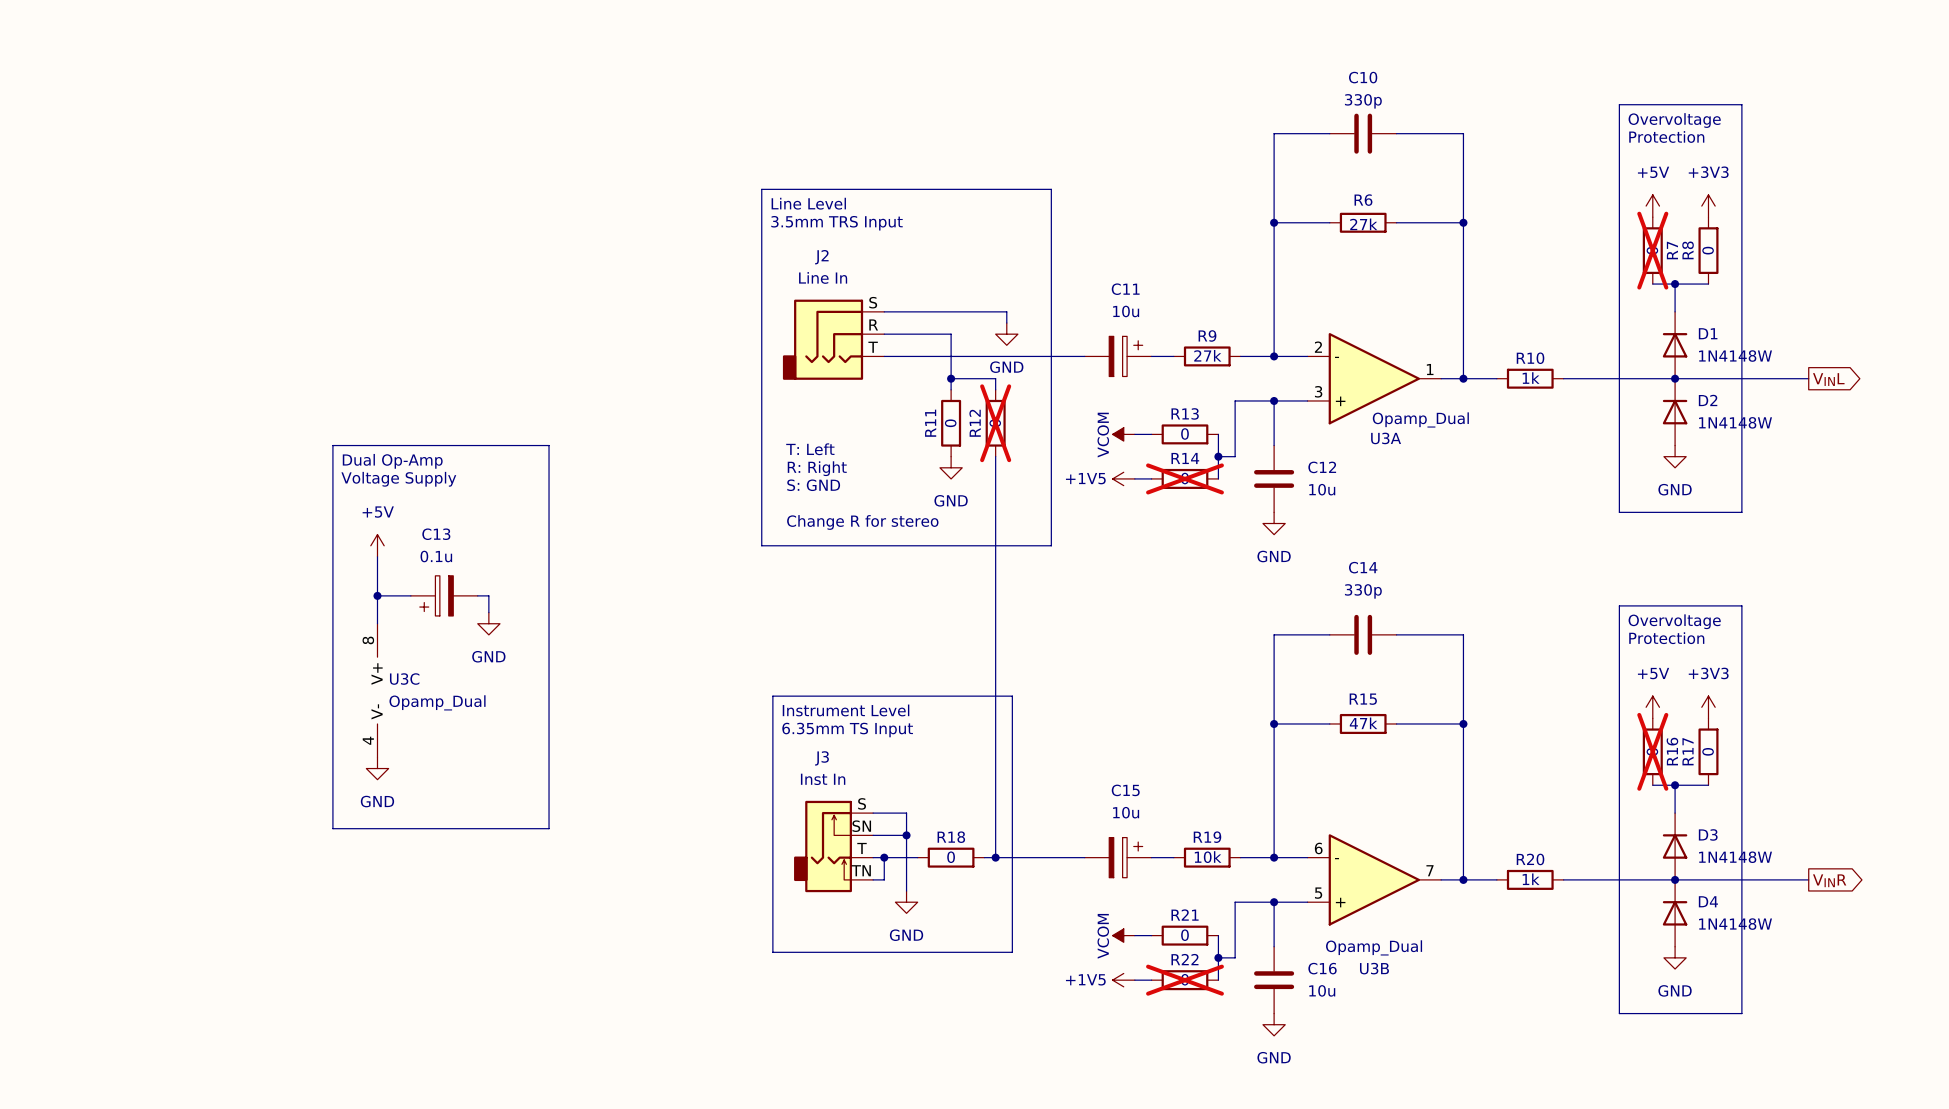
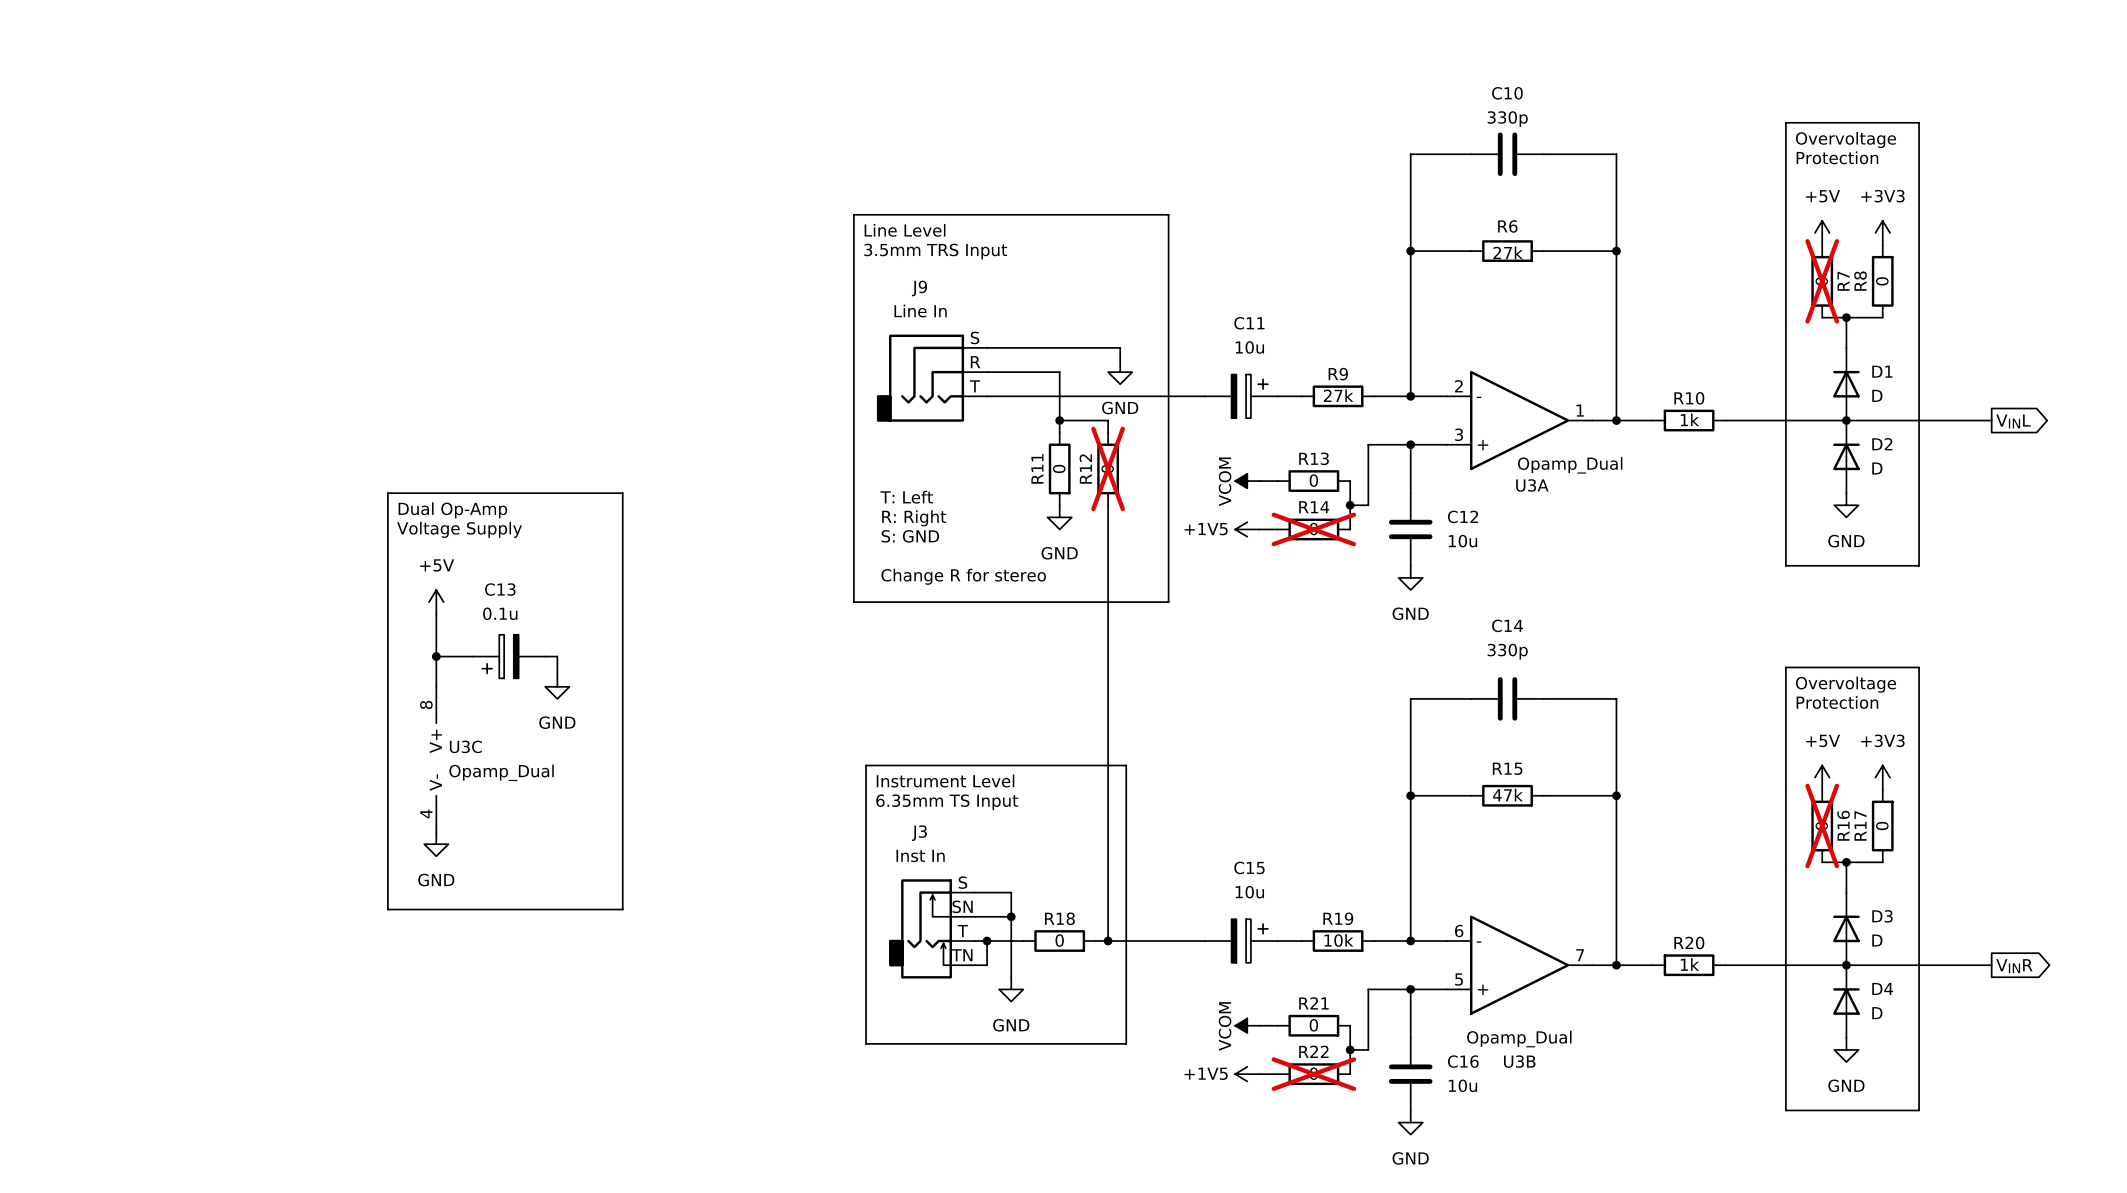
J2 name: J2 (821, 257) -> J9 (919, 288)
D1 value: 1N4148W (1735, 356) -> D (1877, 395)
D2 value: 1N4148W (1735, 422) -> D (1877, 468)
D3 value: 1N4148W (1735, 857) -> D (1877, 940)
D4 value: 1N4148W (1735, 924) -> D (1877, 1013)

